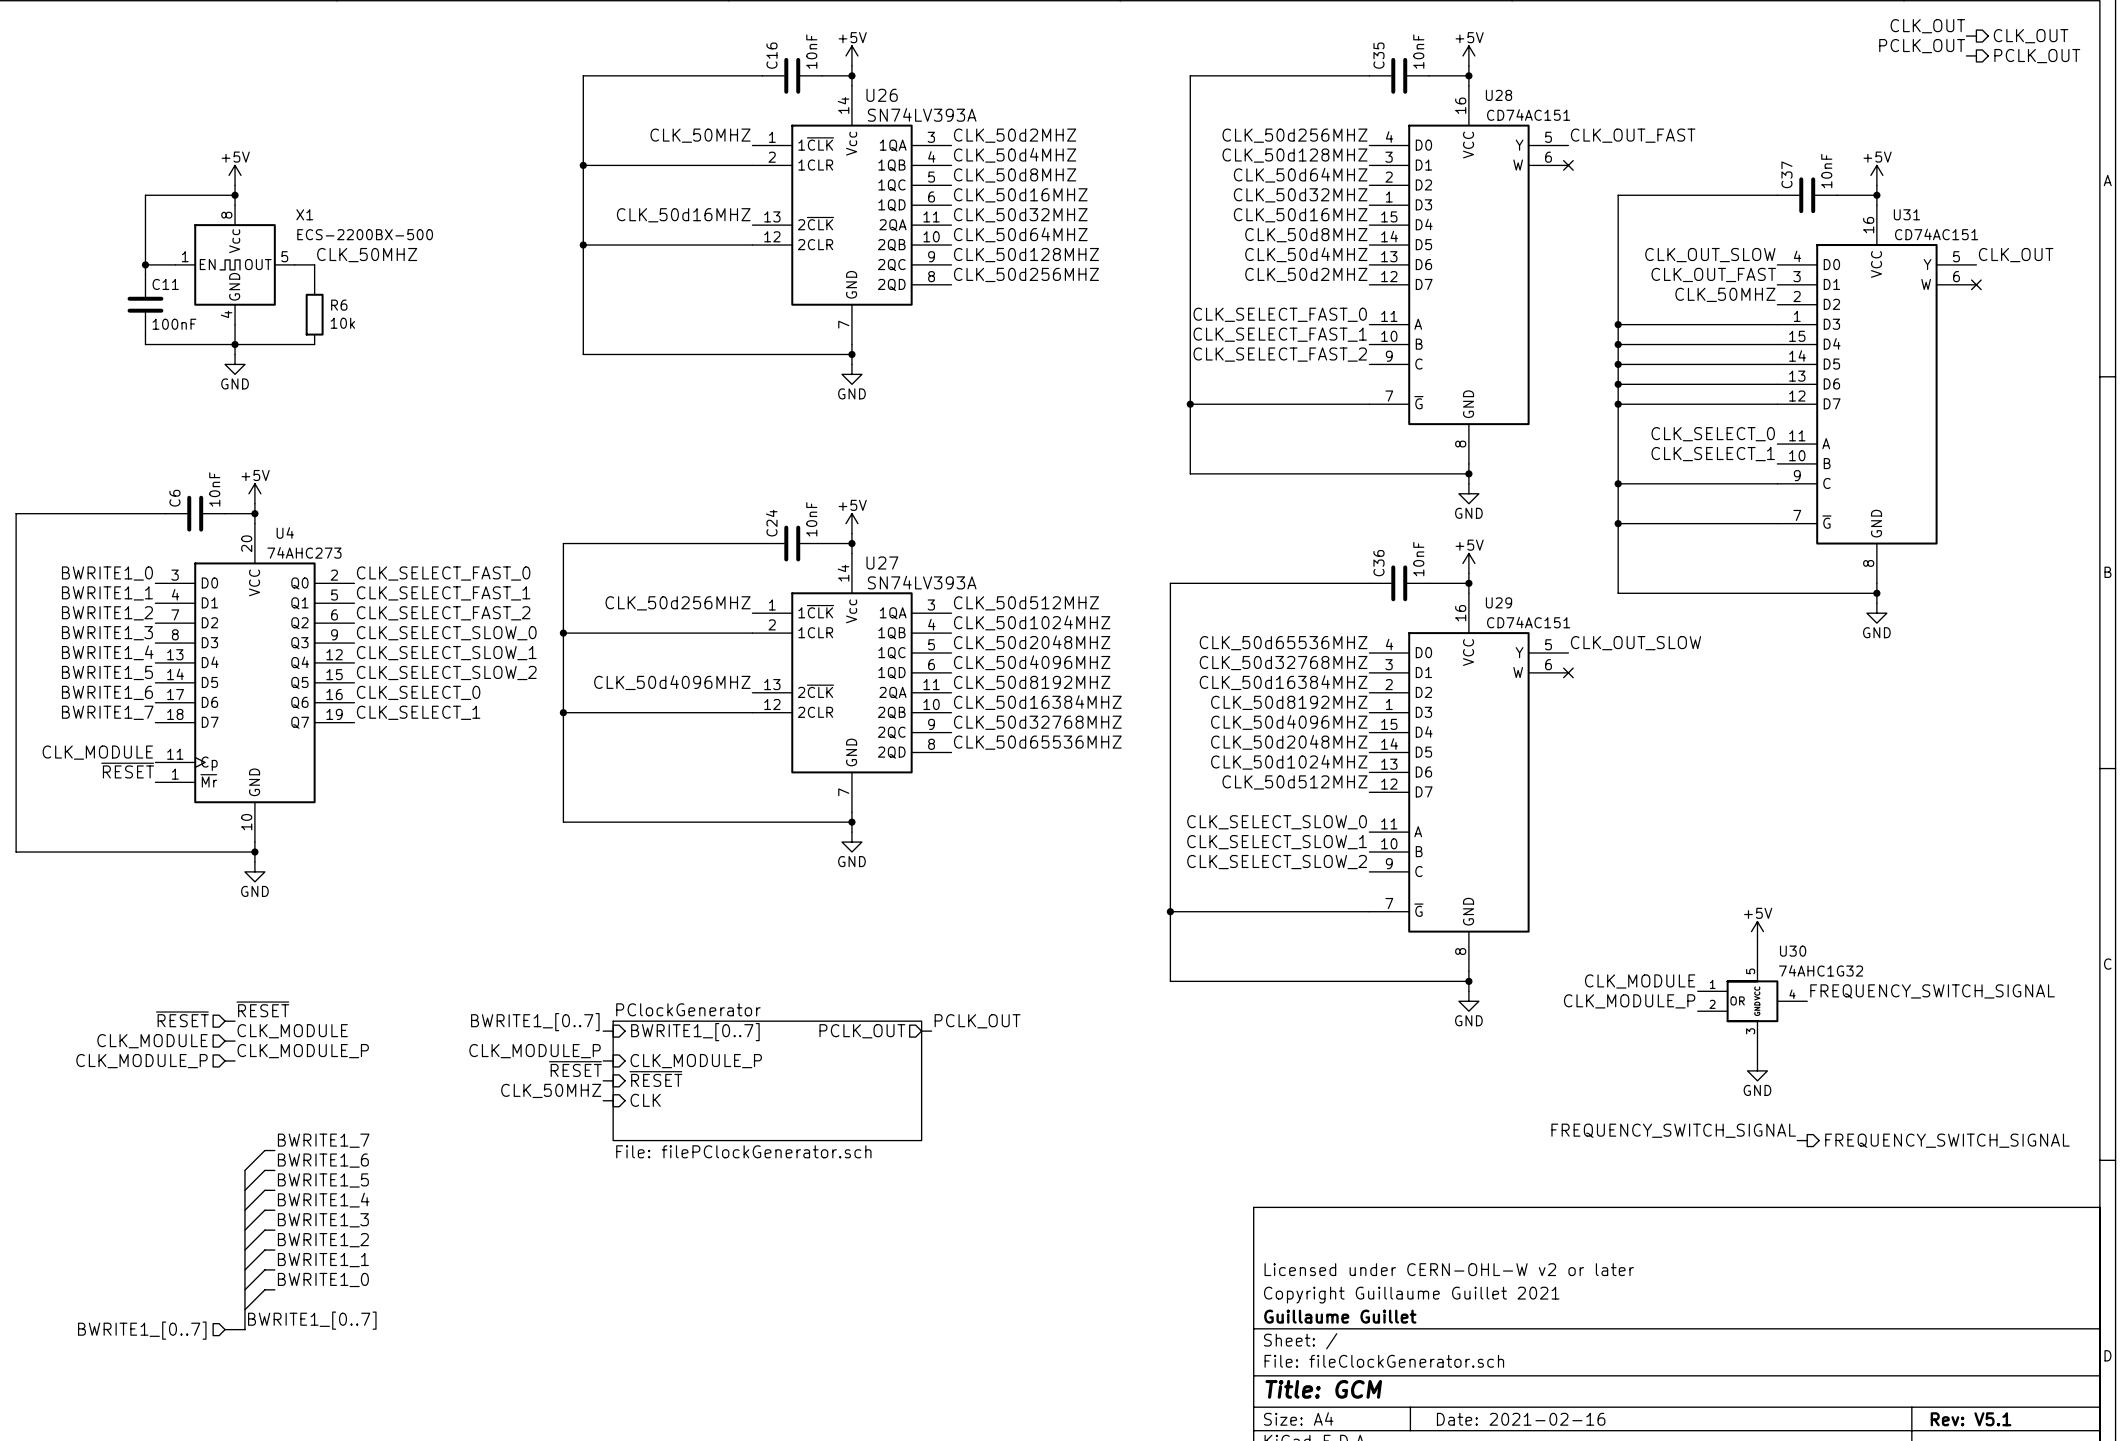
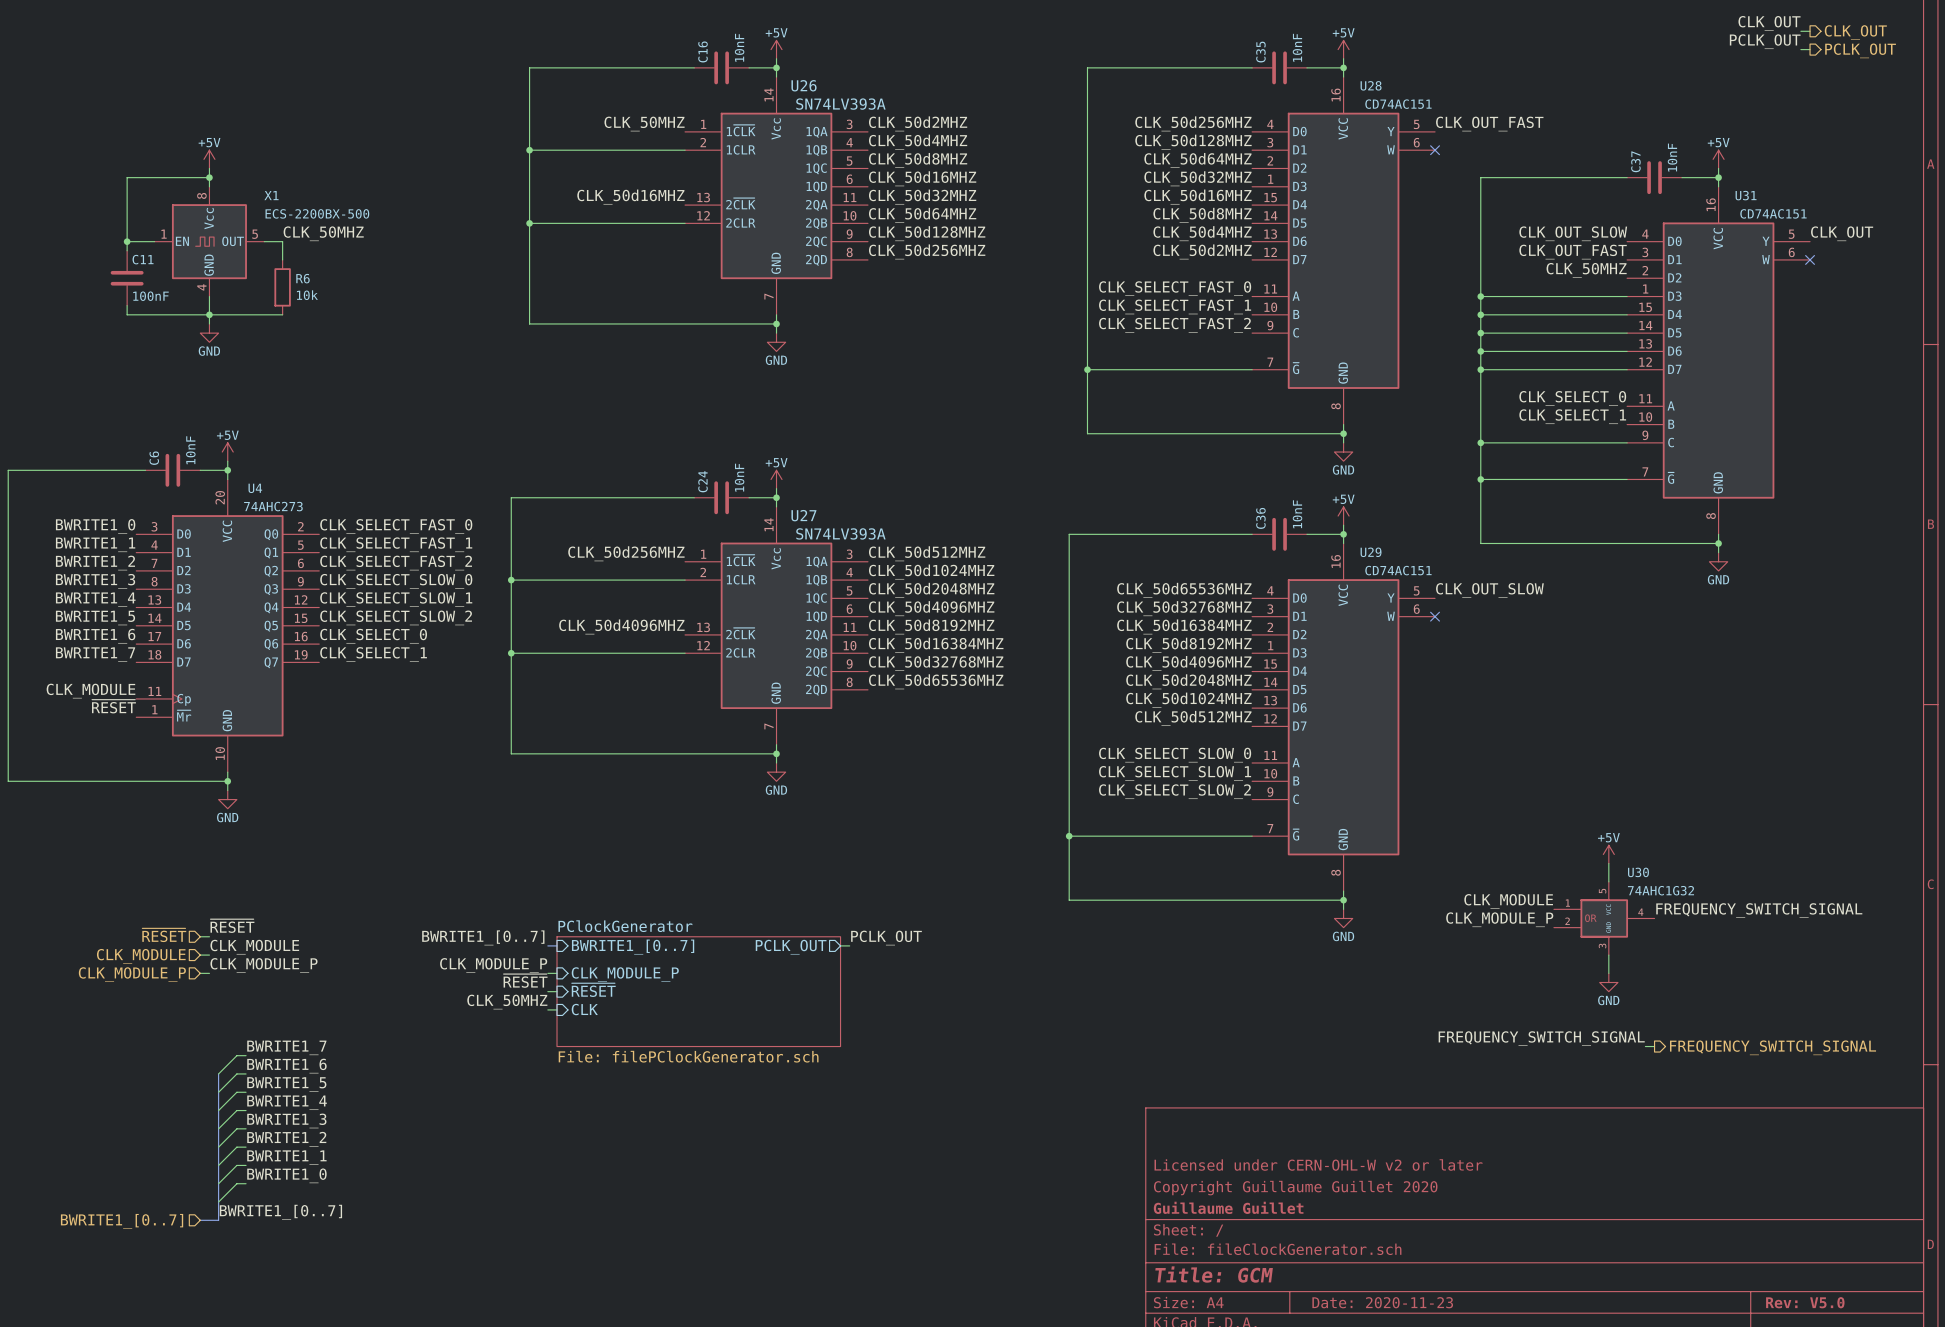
title block: Copyright Guillaume Guillet 2021 (1411, 1295) -> Copyright Guillaume Guillet 2020 (1295, 1188)
title block: Date: 2021-02-16 (1521, 1419) -> Date: 2020-11-23 (1382, 1302)
title block: Rev: V5.1 (1971, 1419) -> Rev: V5.0 (1805, 1302)

